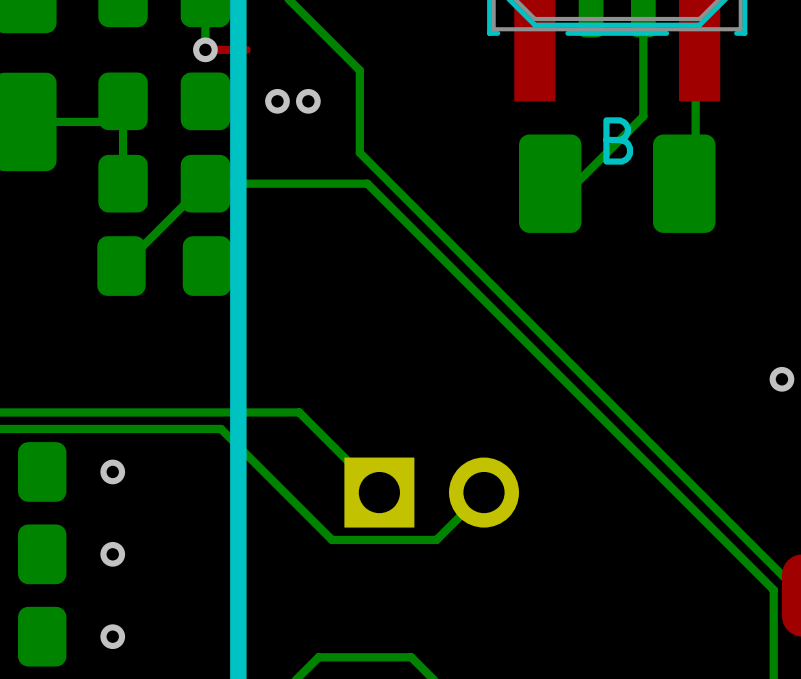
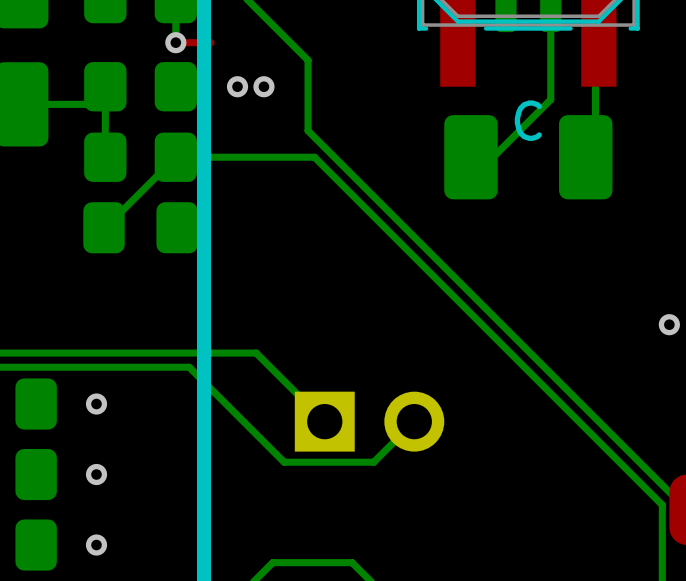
part value: B (618, 140) -> C (528, 120)

